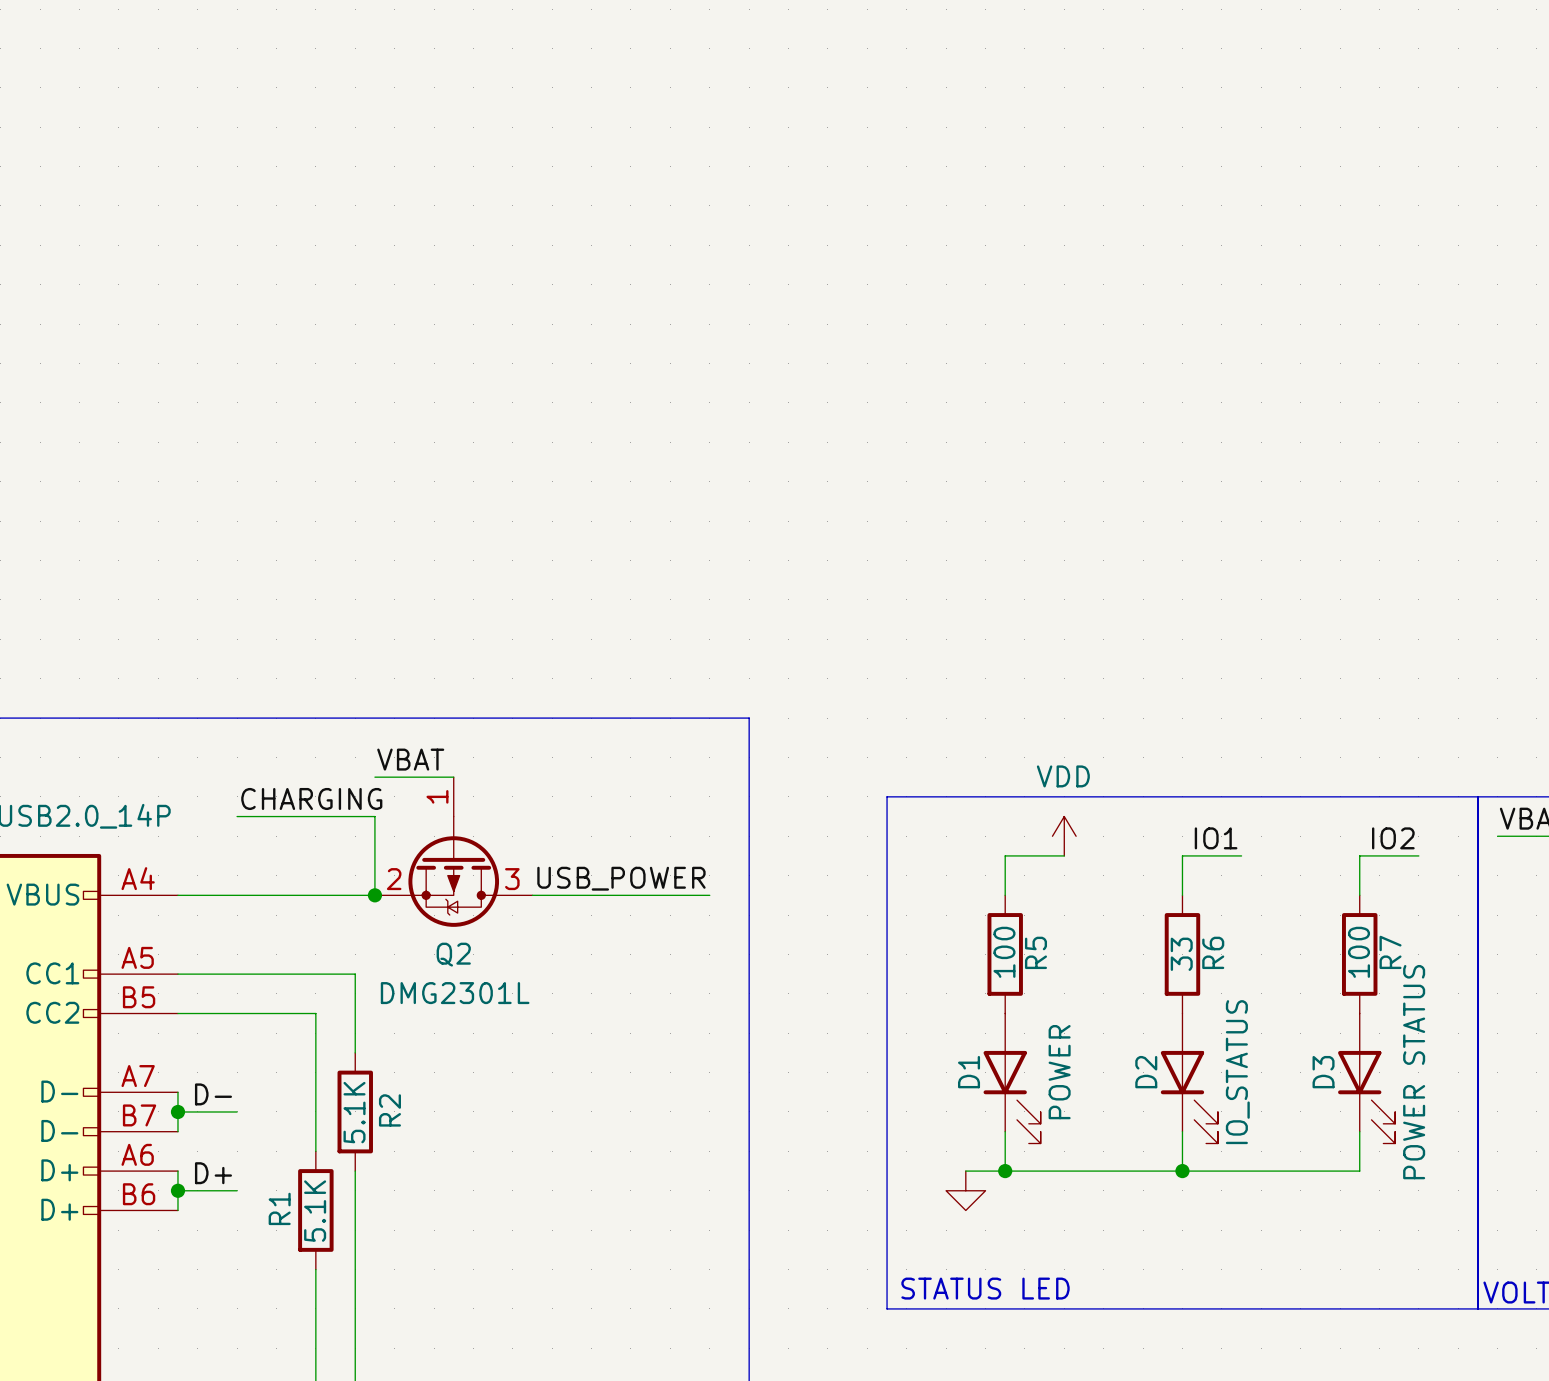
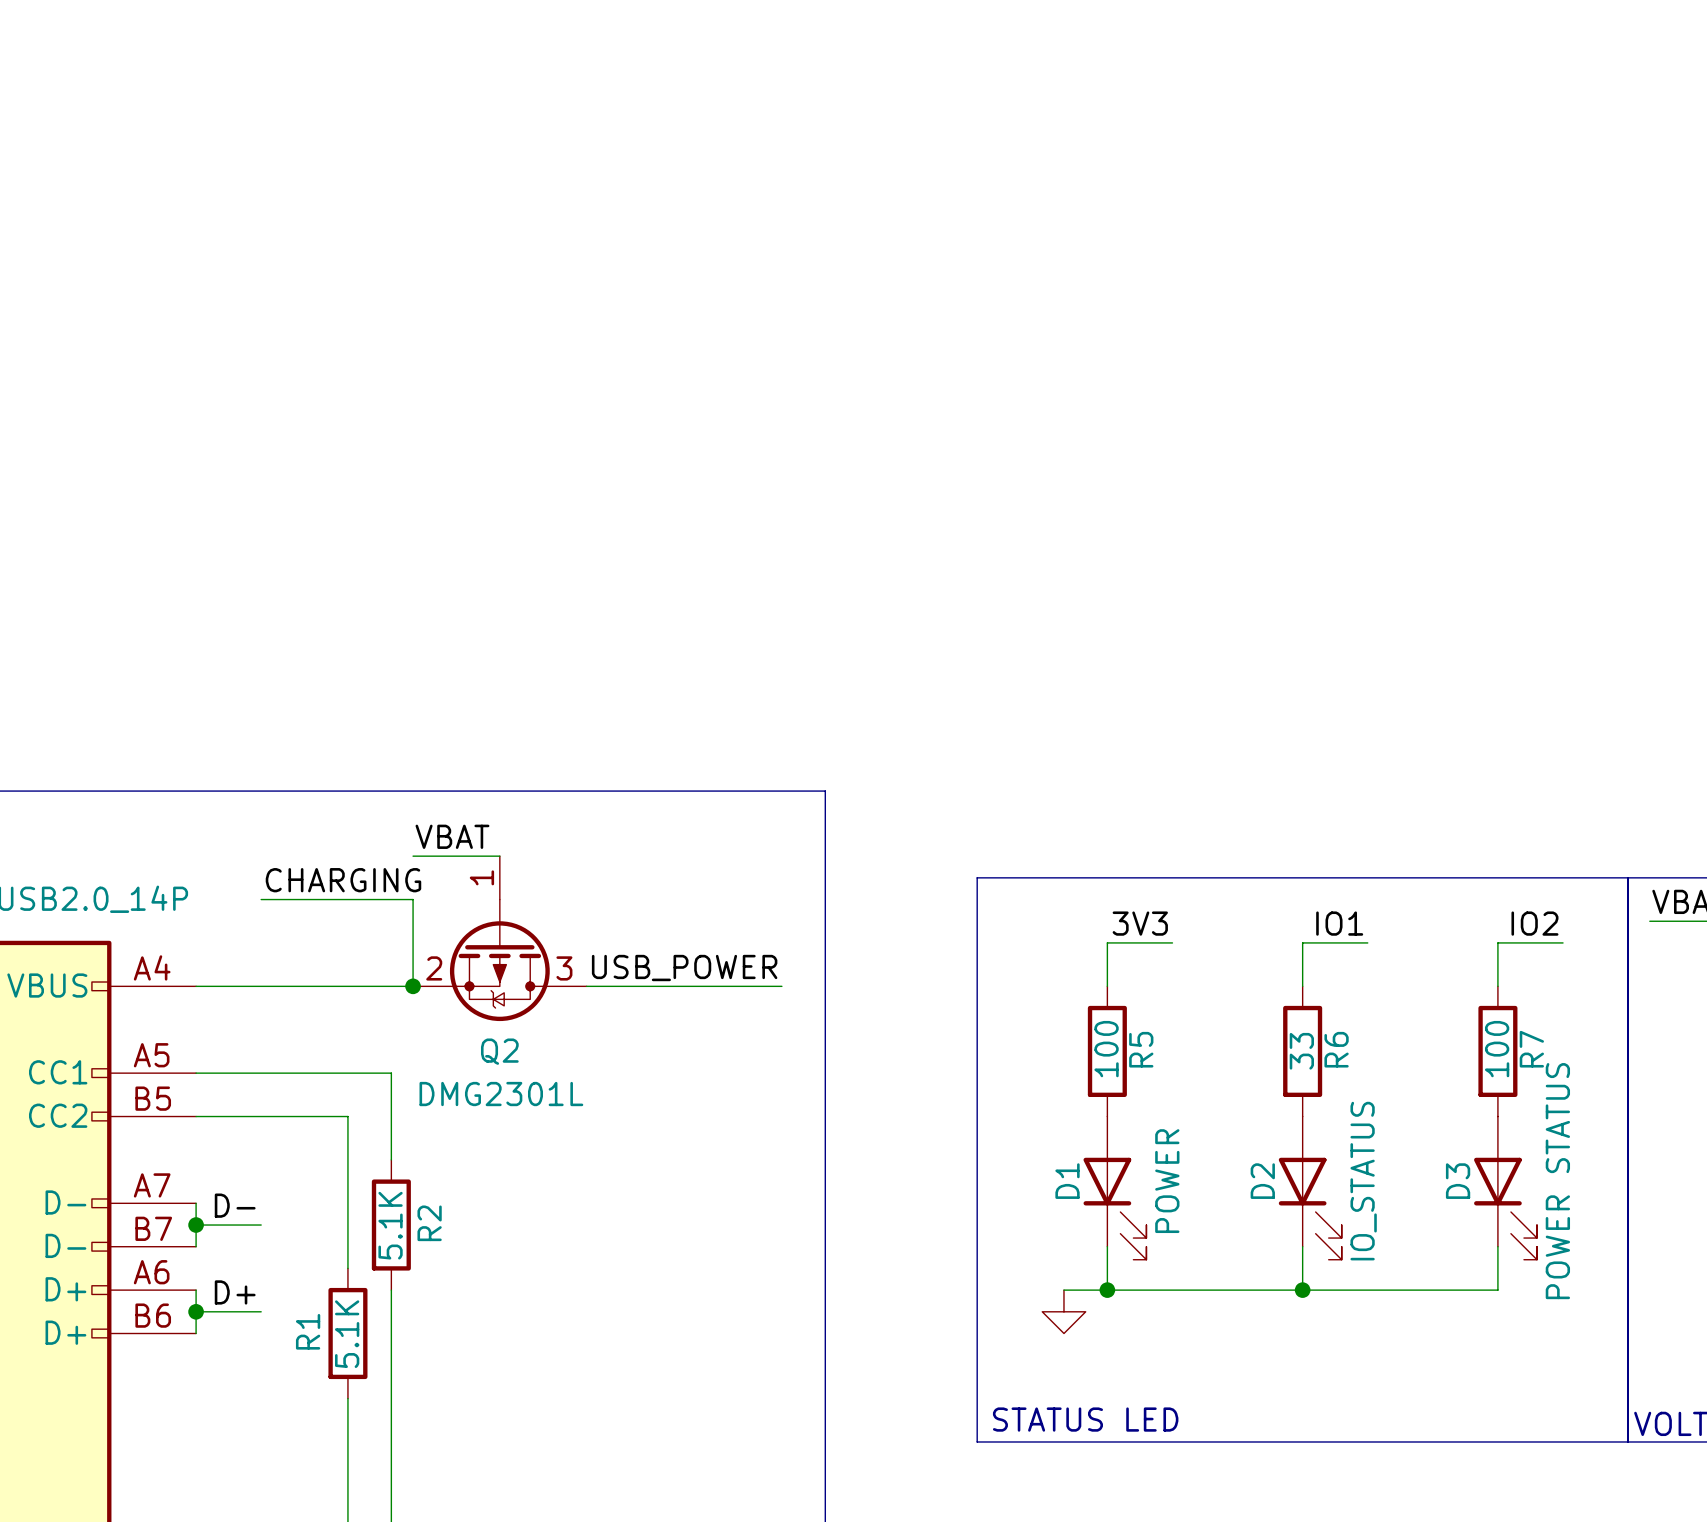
power symbol: VDD (1064, 836) -> none
label: none -> 3V3 (1140, 923)

